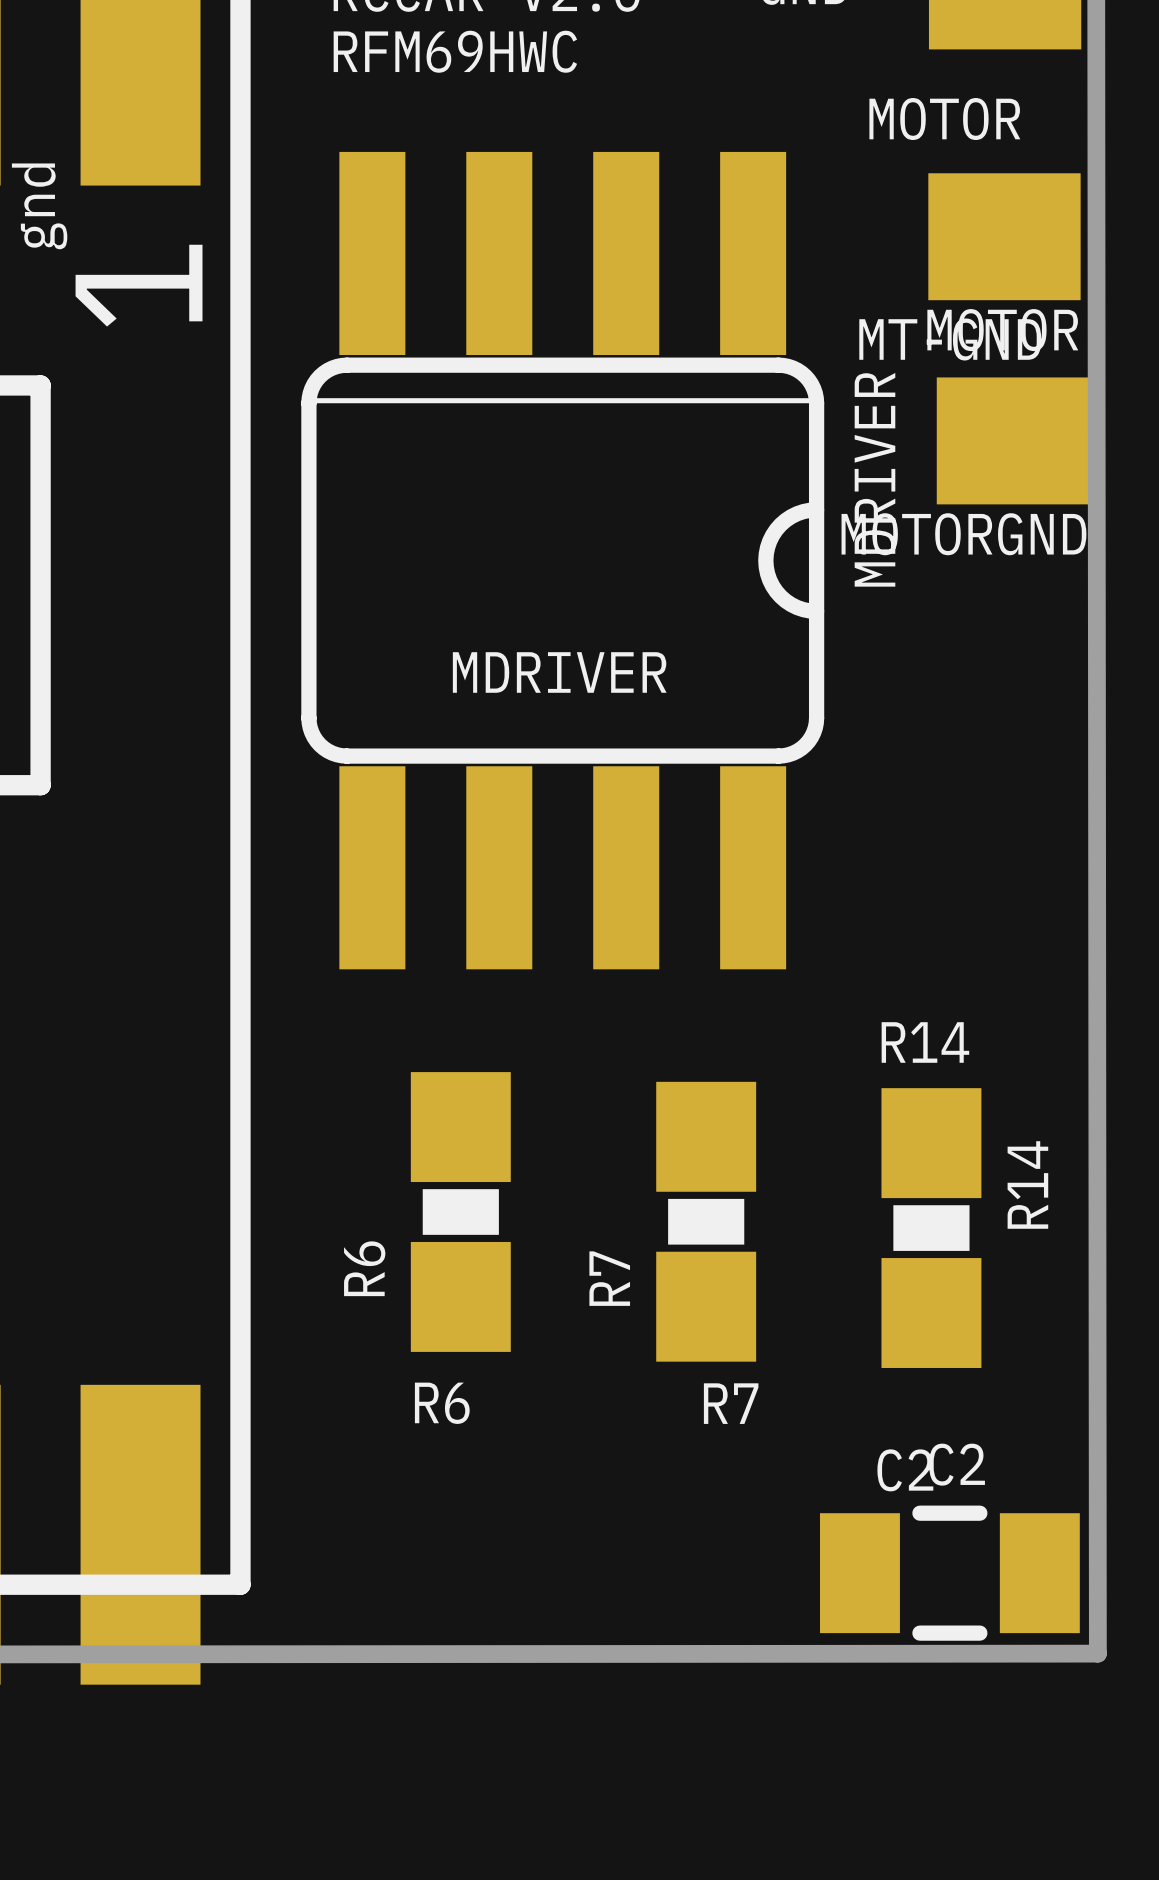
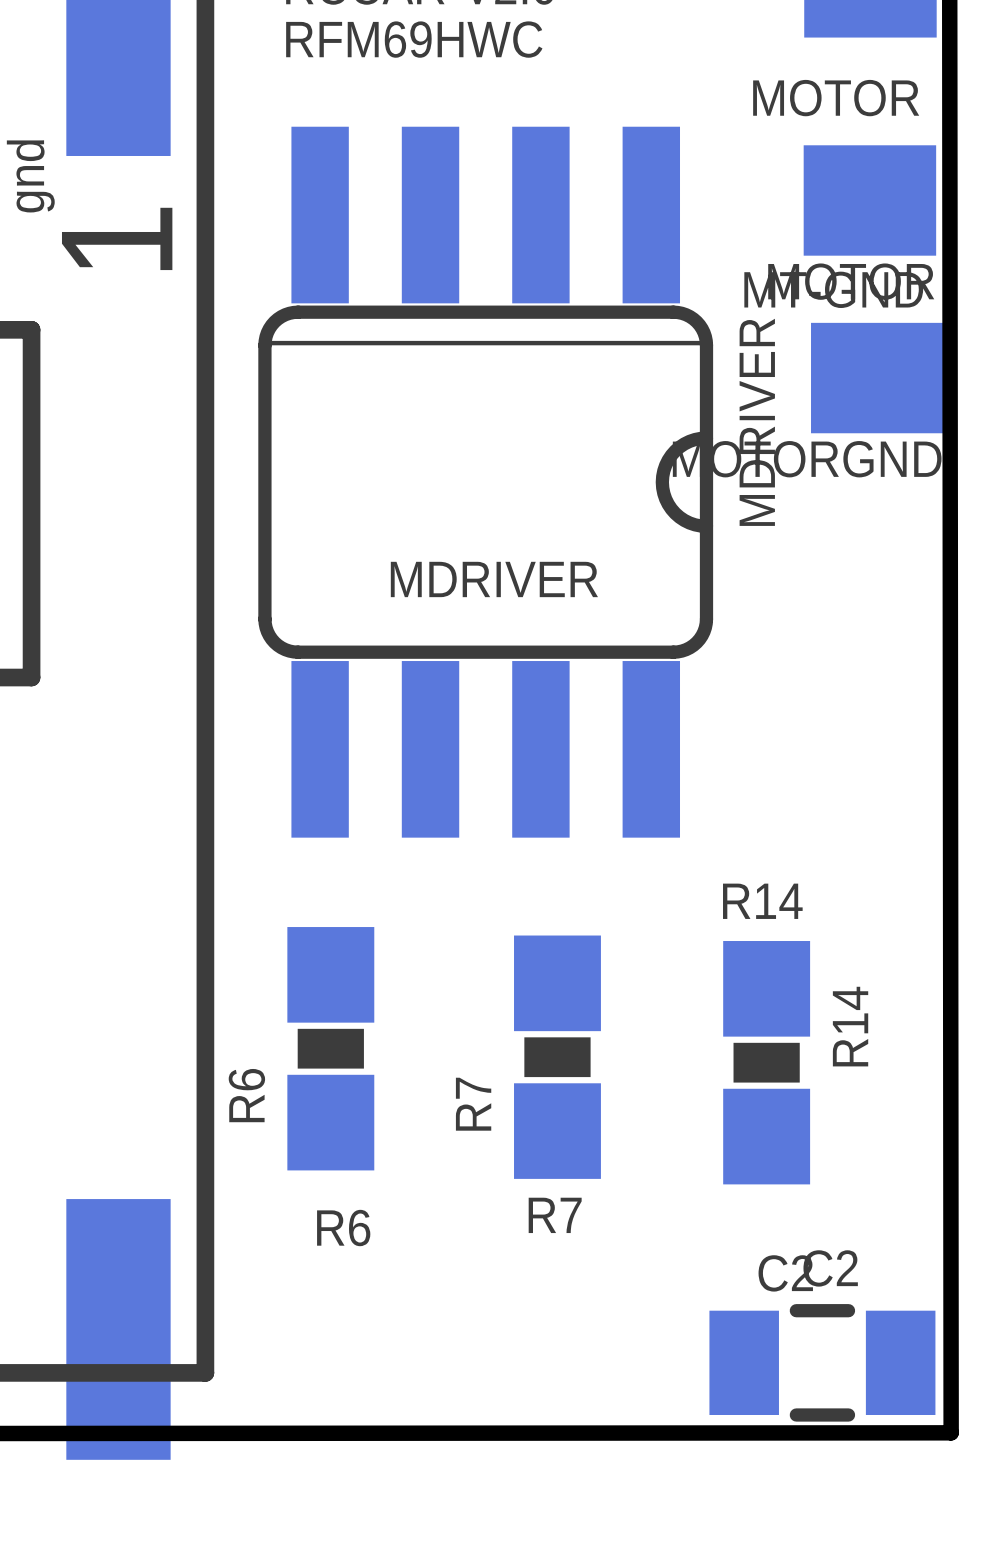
text position: R14 (925, 1042) -> R14 (762, 901)
R6 position: (460, 1212) -> (330, 1048)
R7 position: (706, 1221) -> (557, 1057)
R14 position: (931, 1228) -> (766, 1062)
text position: R6 (442, 1403) -> R6 (343, 1228)
text position: R7 (731, 1403) -> R7 (555, 1215)

